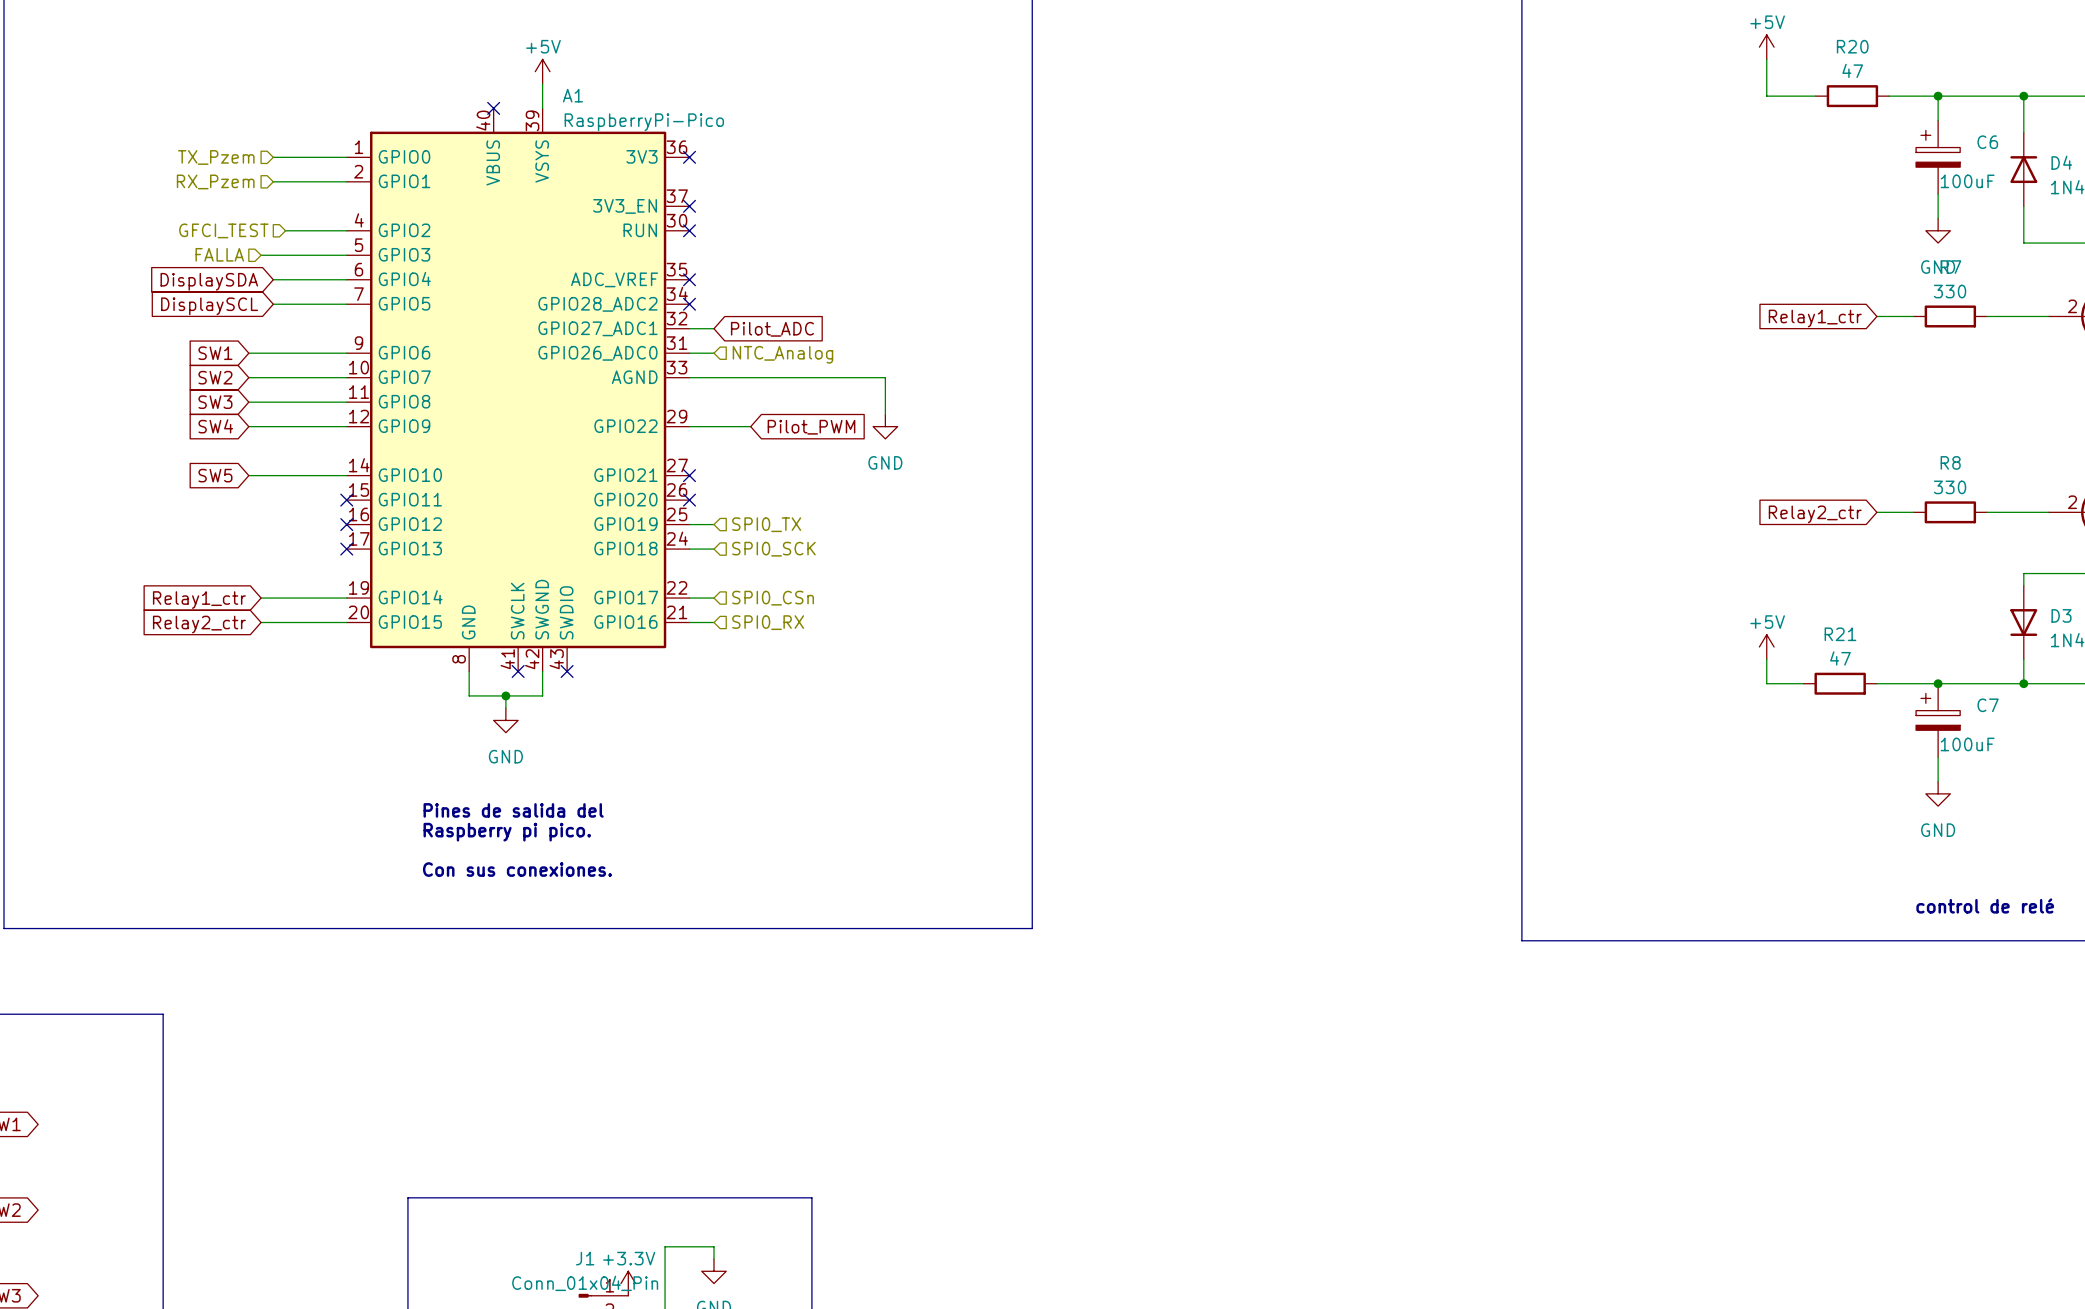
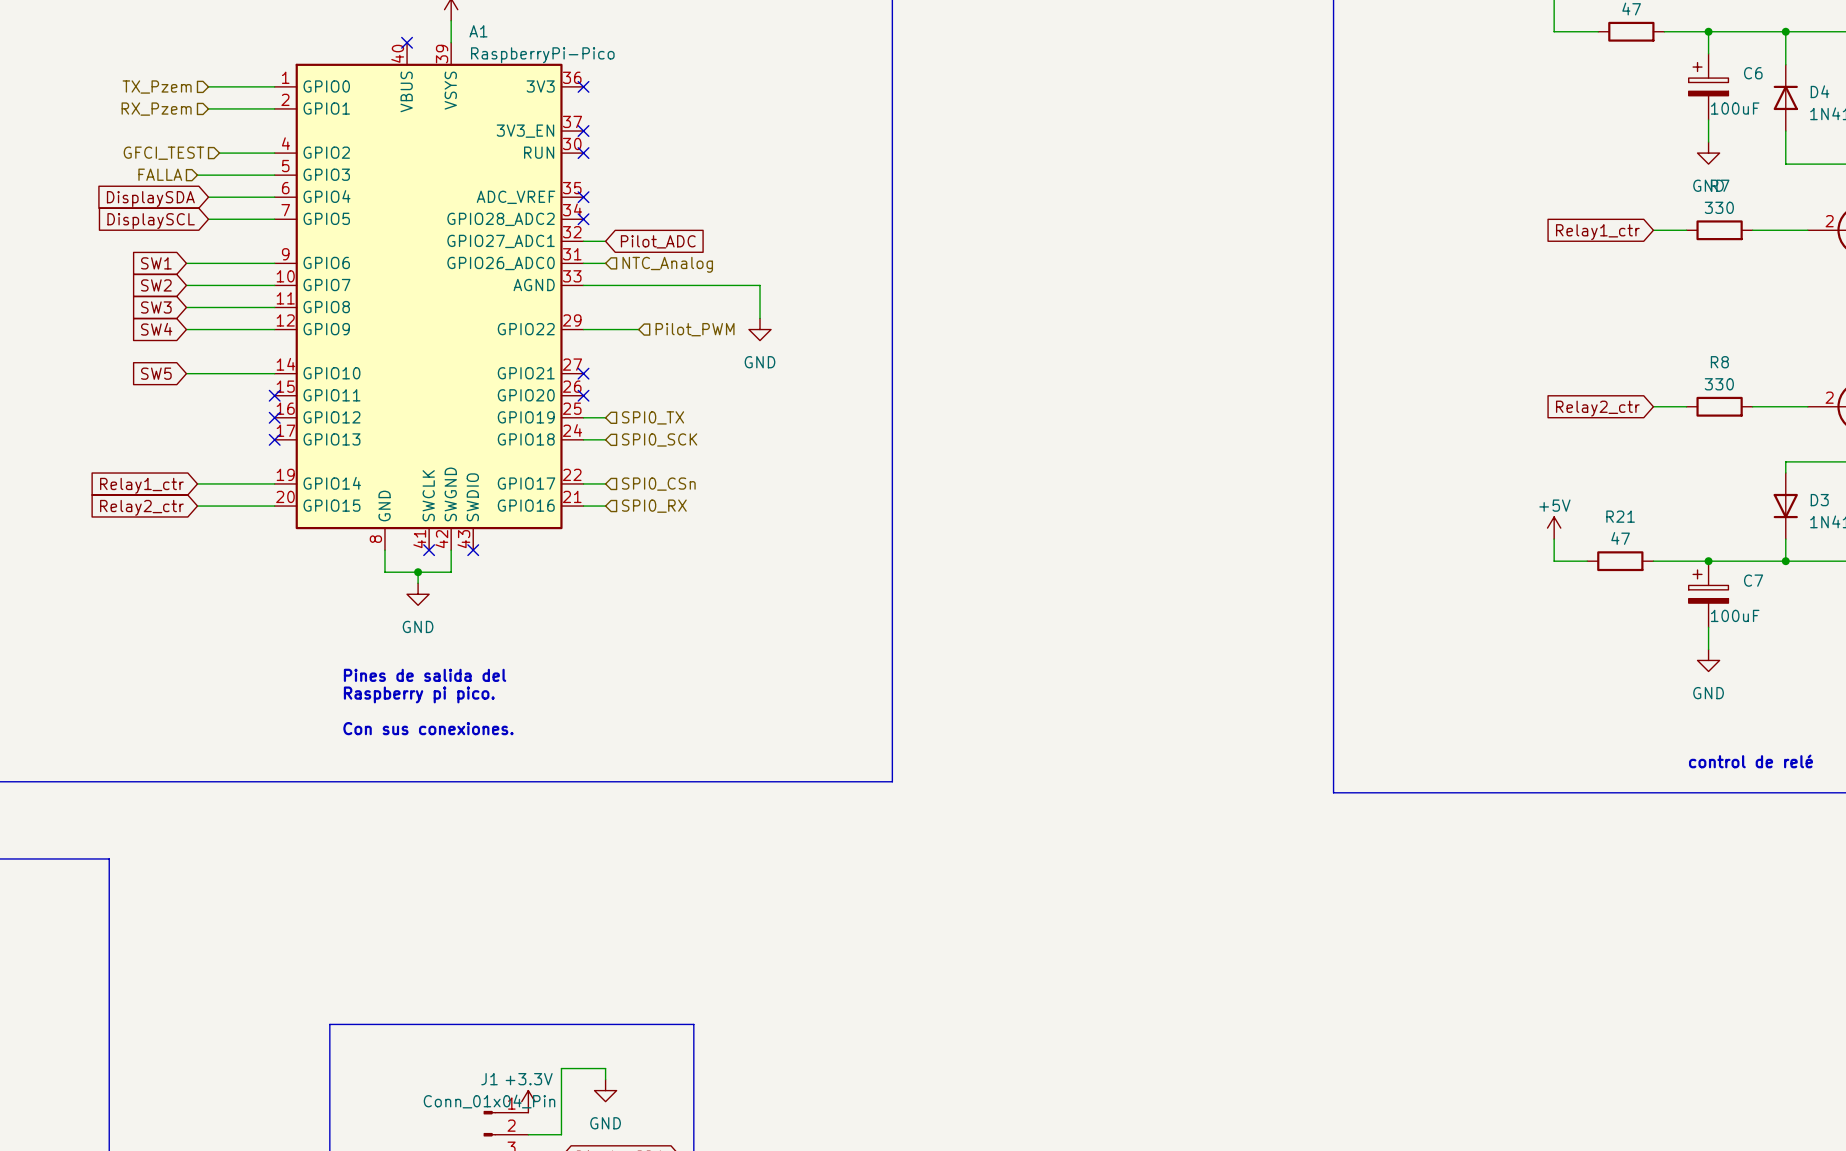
hierarchical label: none -> Pilot_PWM (695, 329)
global label: Pilot_PWM (811, 427) -> none

